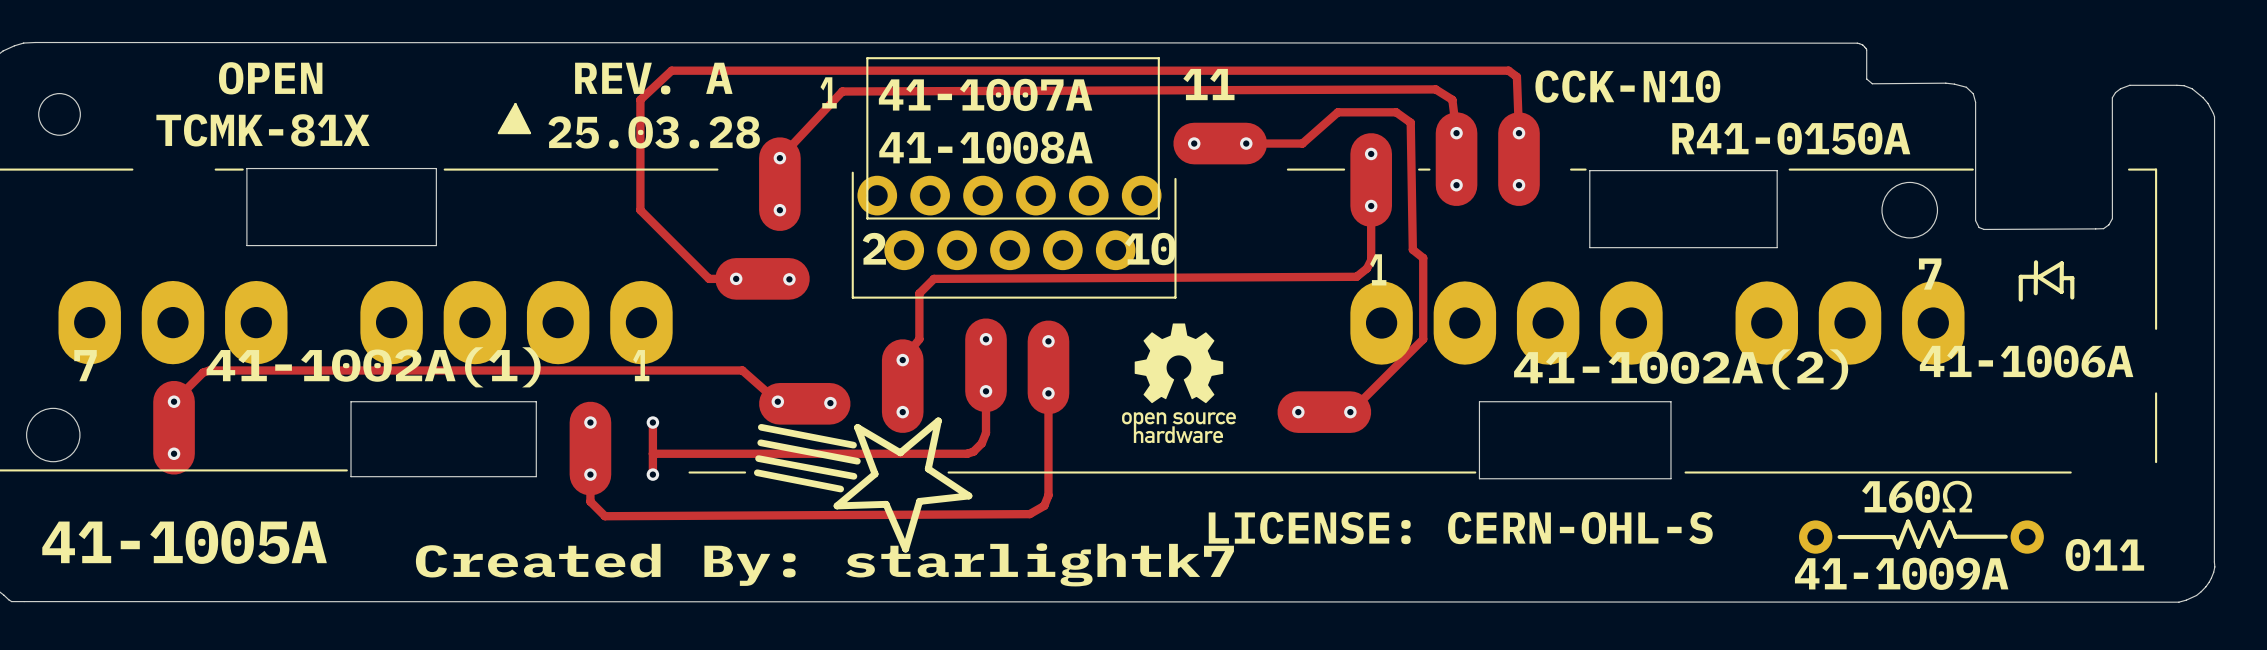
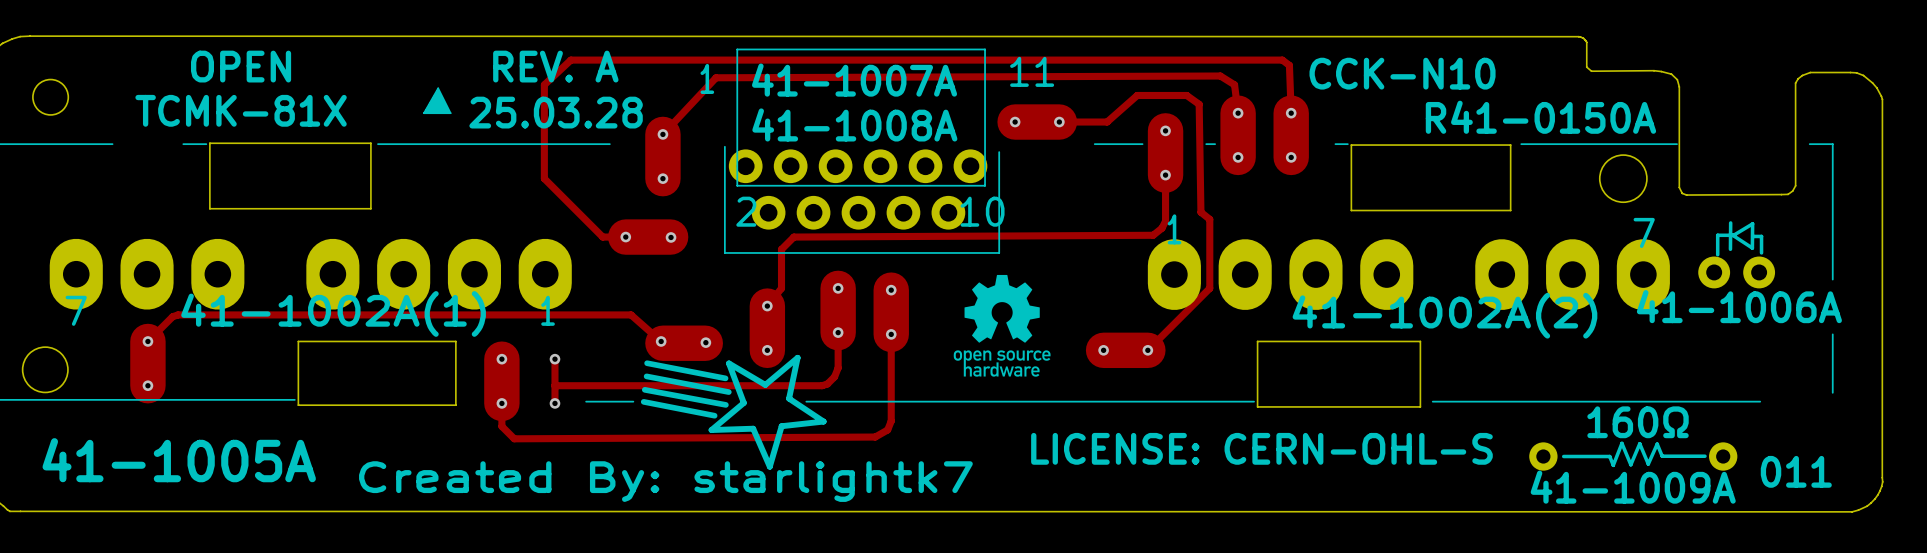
part: none -> (1736, 272)

